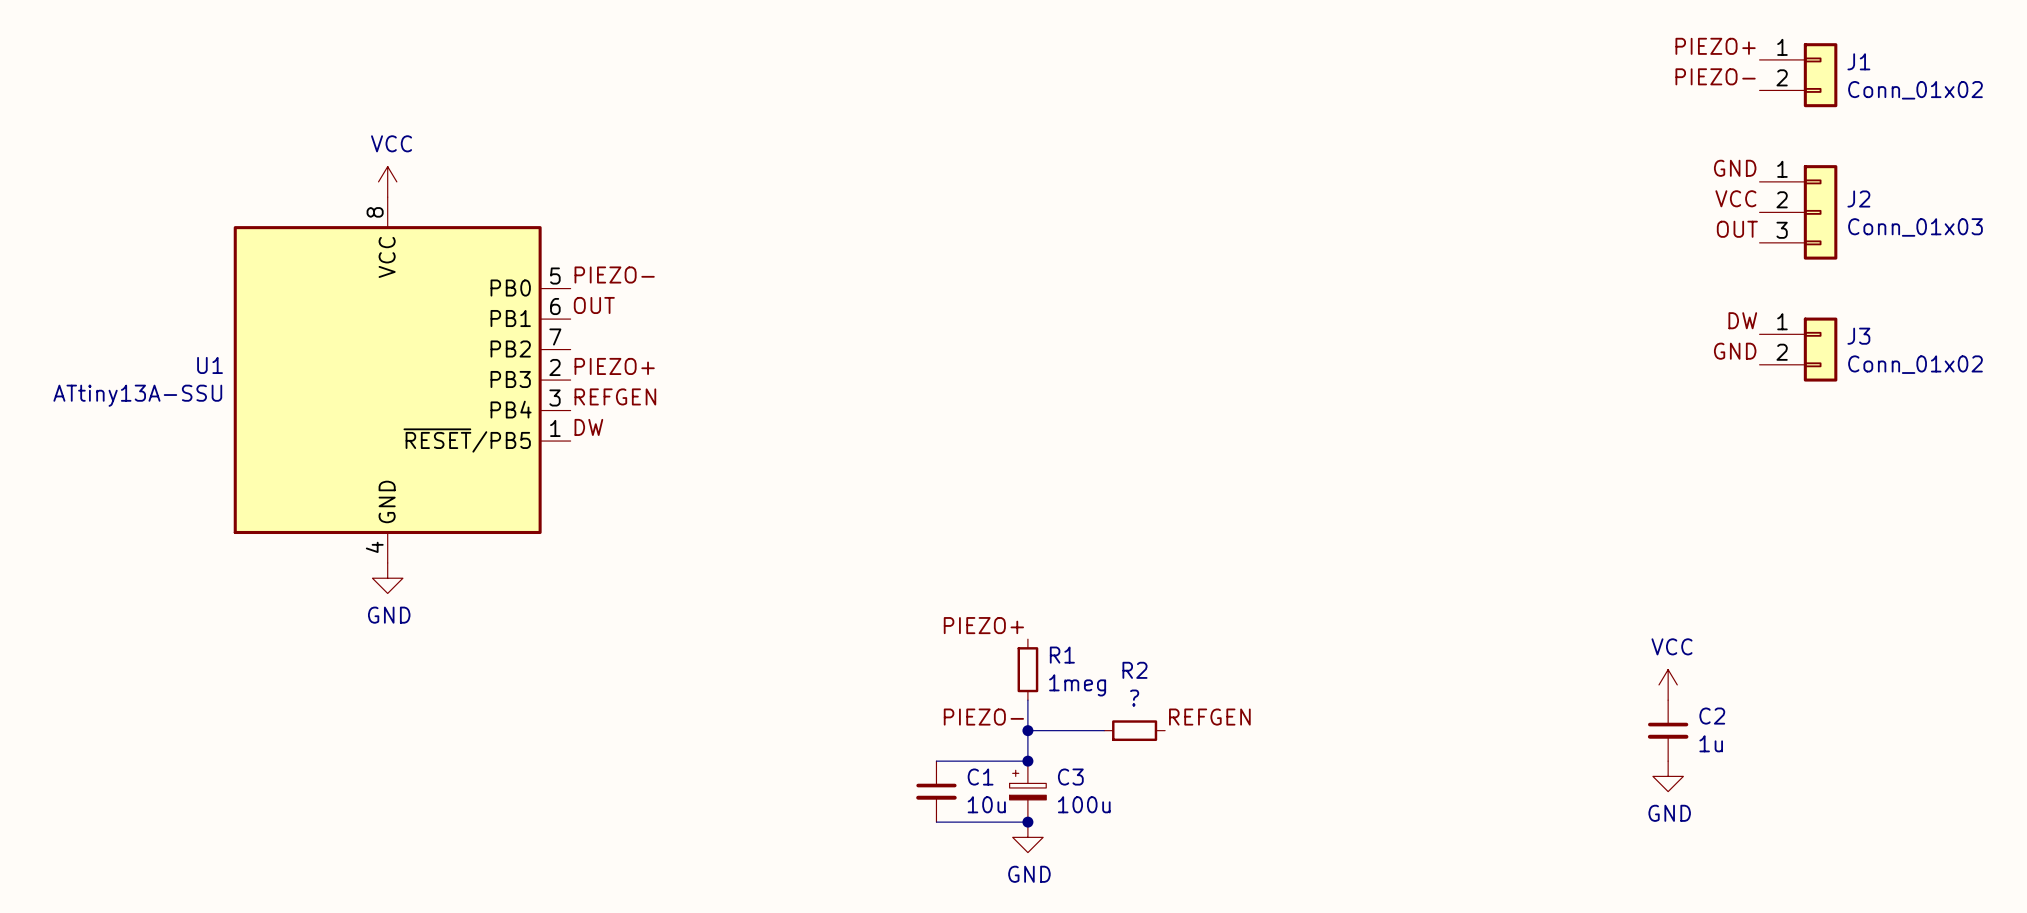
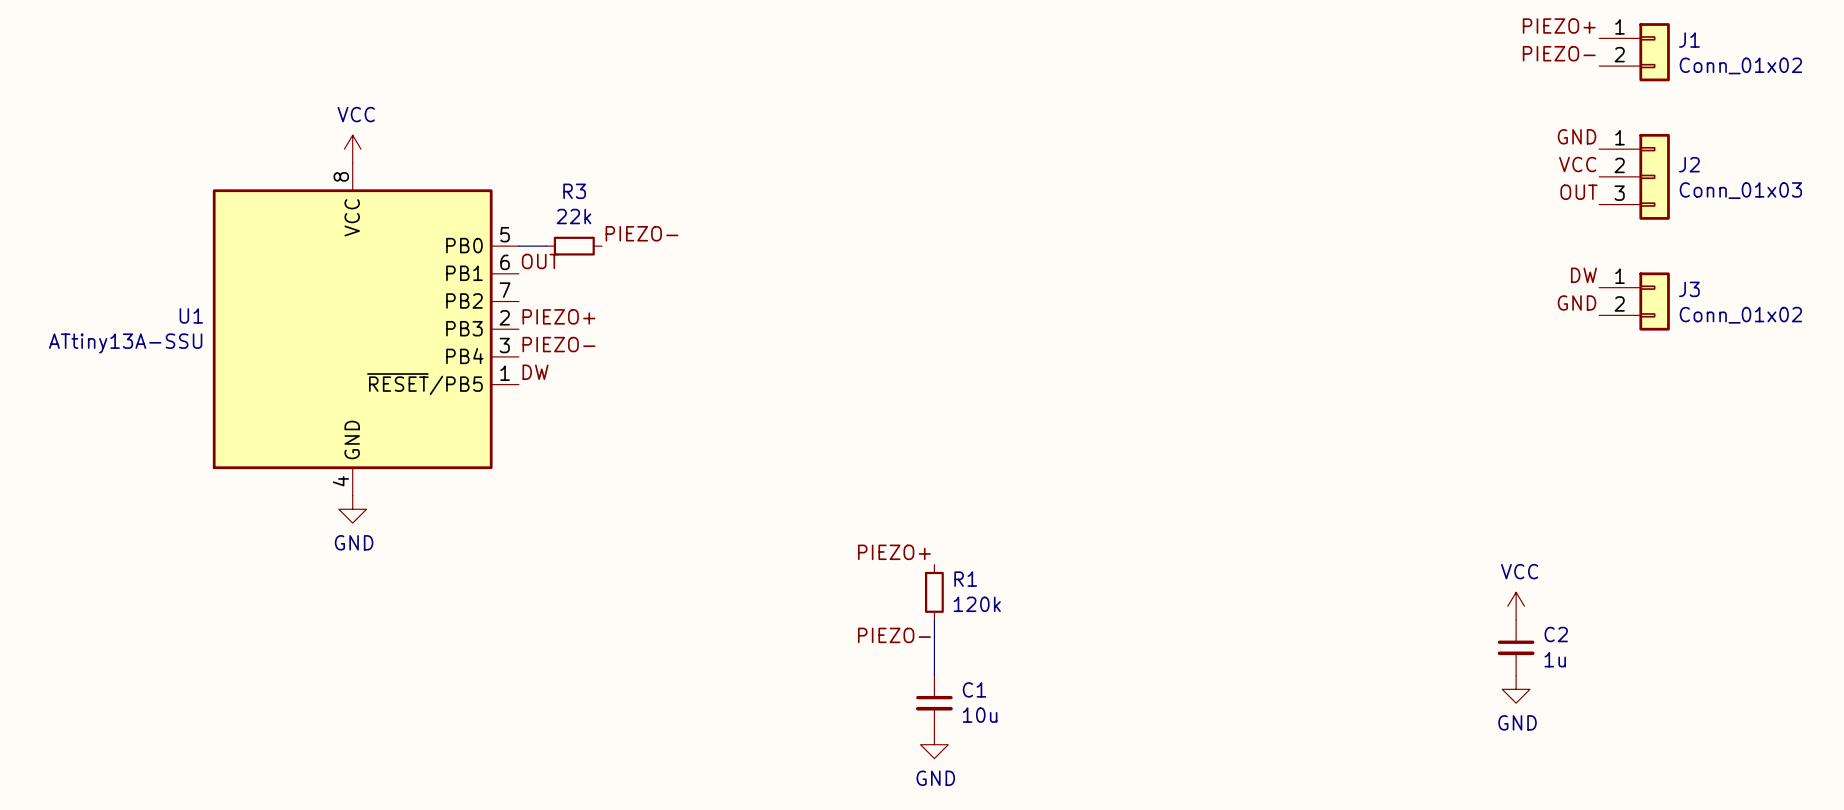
label position: PIEZO- (614, 274) -> PIEZO- (642, 233)
wire: none -> (518, 246) (546, 246)
R3: none -> 22k (574, 246)
label: REFGEN (615, 396) -> PIEZO- (558, 344)
R1 value: 1meg (1077, 685) -> 120k (977, 604)
label: REFGEN (1209, 717) -> none
wire: (1027, 730) (1104, 730) -> none
junction: (1027, 730) -> none
R2: ? (1134, 730) -> none
wire: (936, 761) (1027, 761) -> none
junction: (1027, 761) -> none
C1 position: (936, 791) -> (934, 703)
C3: 100u (1027, 791) -> none
wire: (936, 822) (1027, 822) -> none
junction: (1027, 822) -> none

